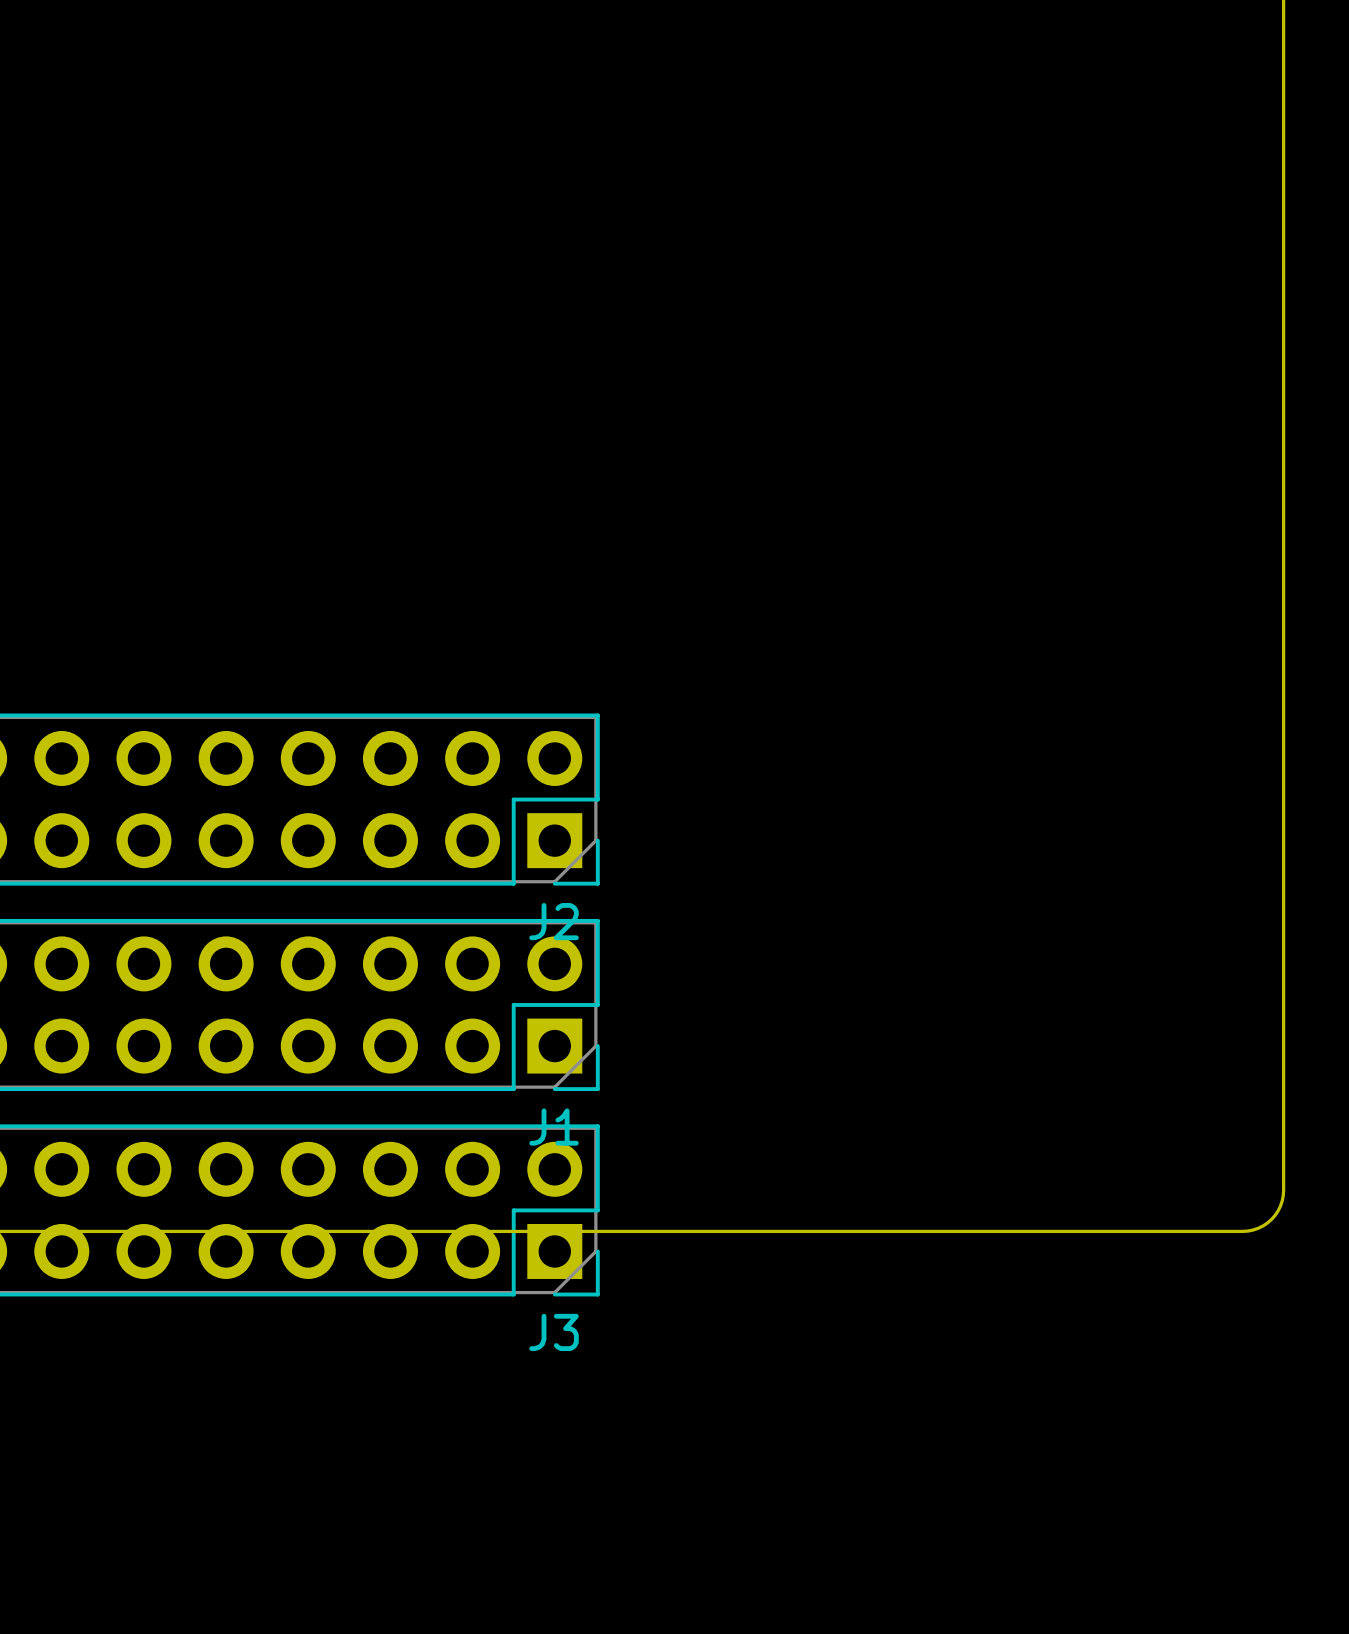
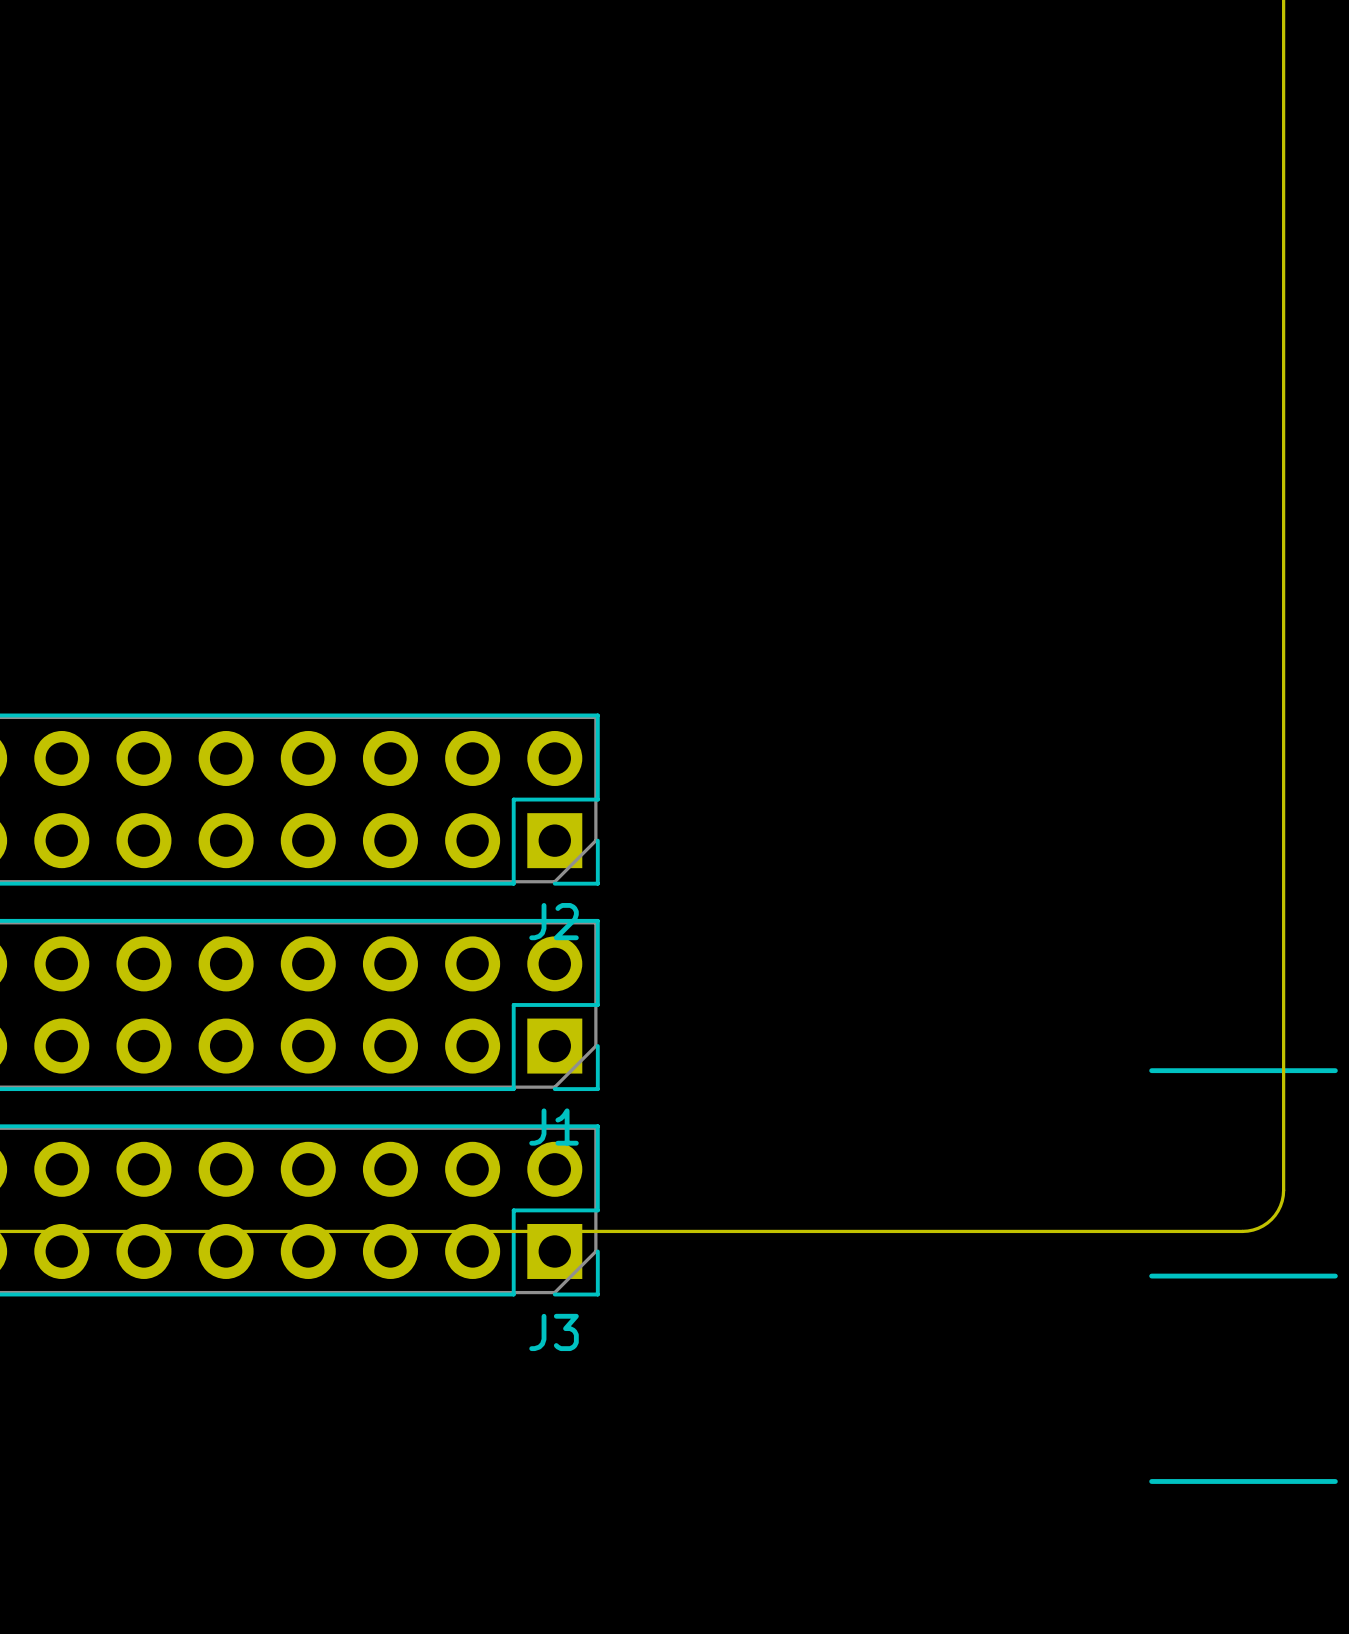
line: none -> (1151, 1070) (1335, 1070)
line: none -> (1151, 1276) (1335, 1276)
line: none -> (1151, 1481) (1335, 1481)

